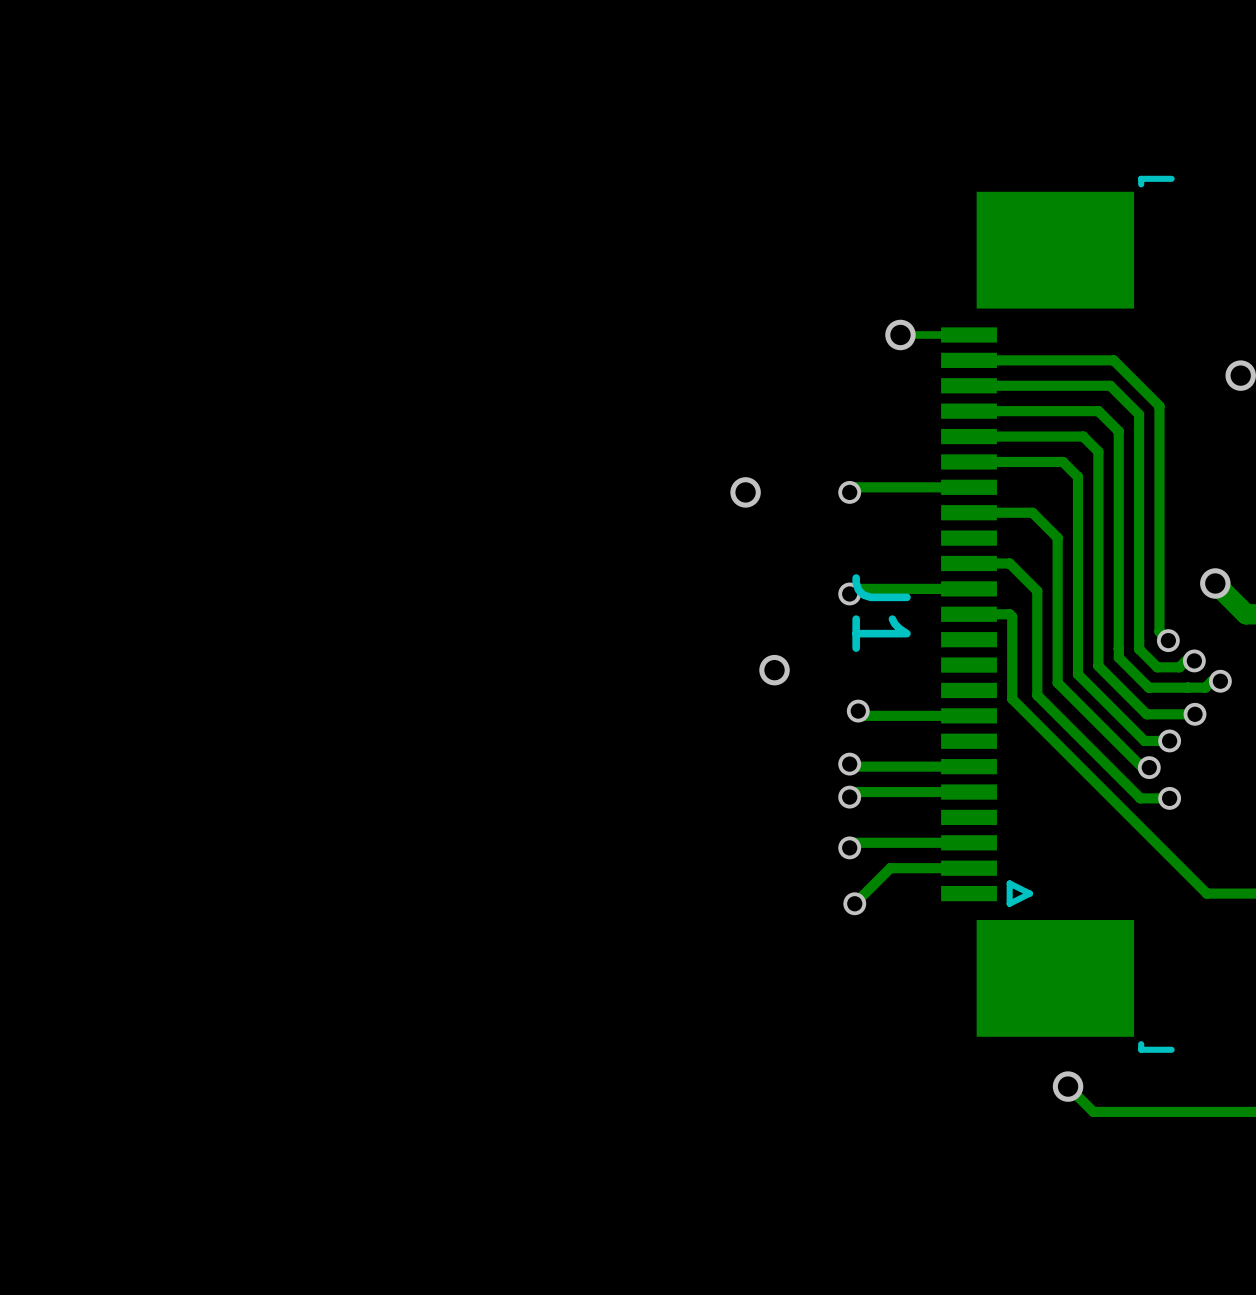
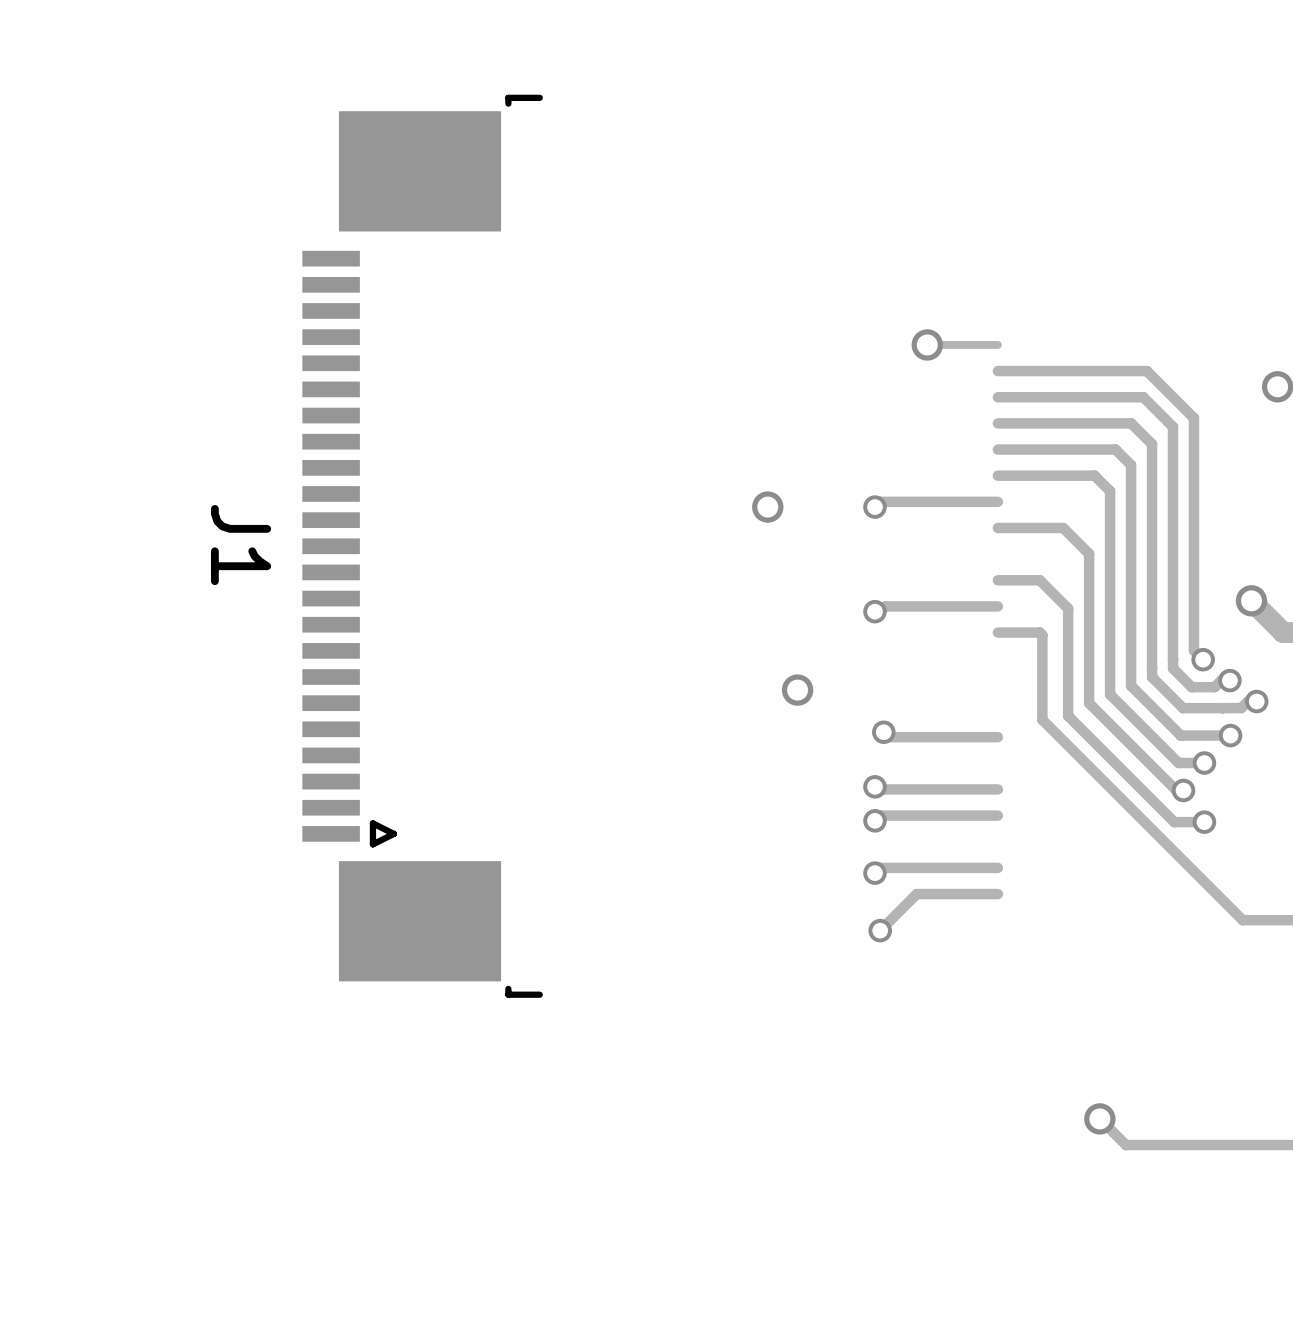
J1 position: (1057, 614) -> (422, 546)

